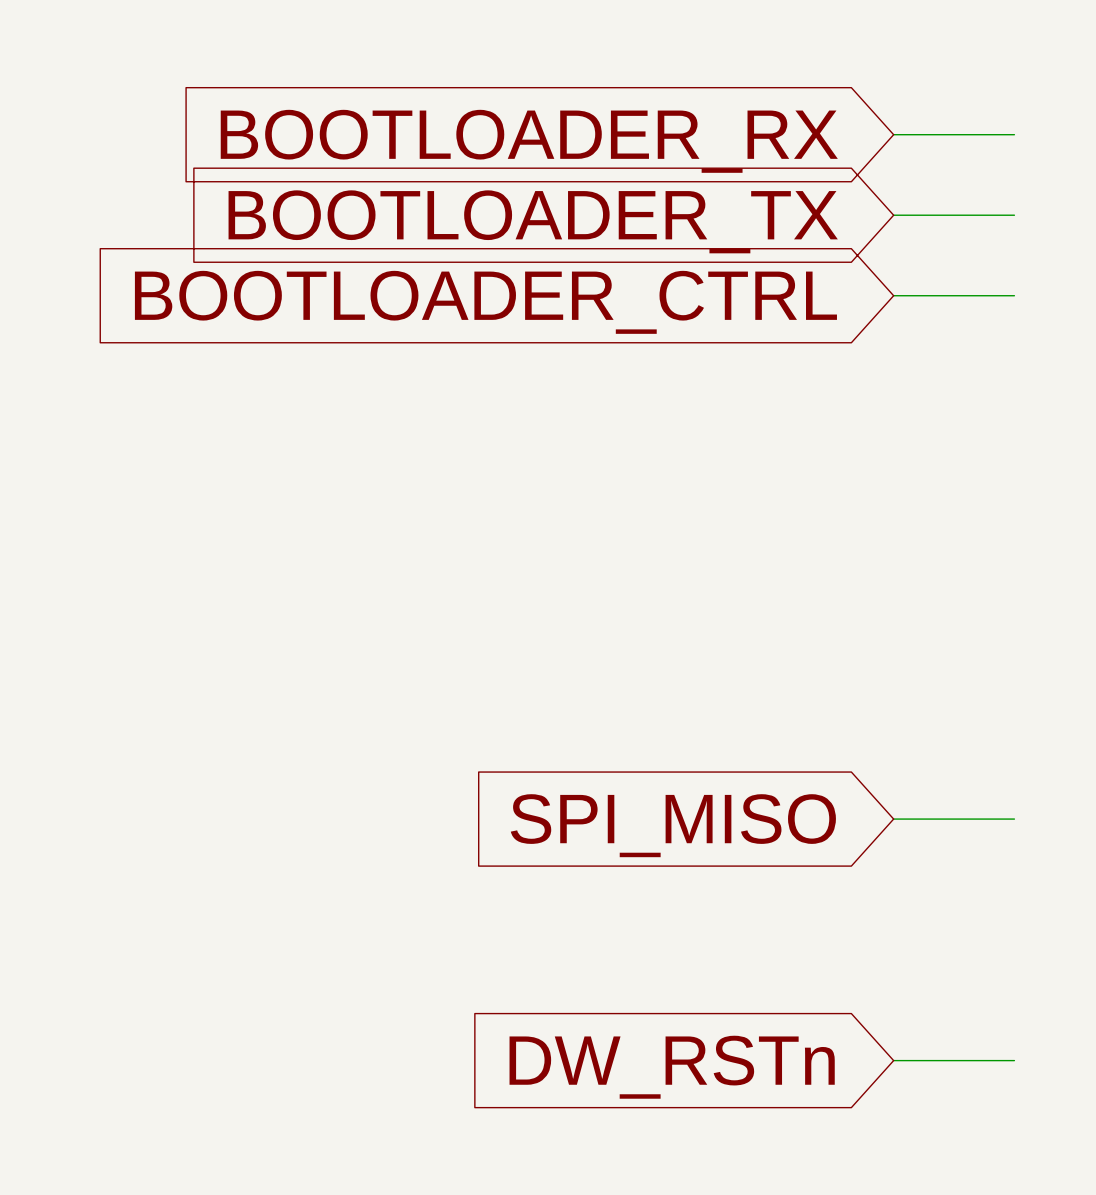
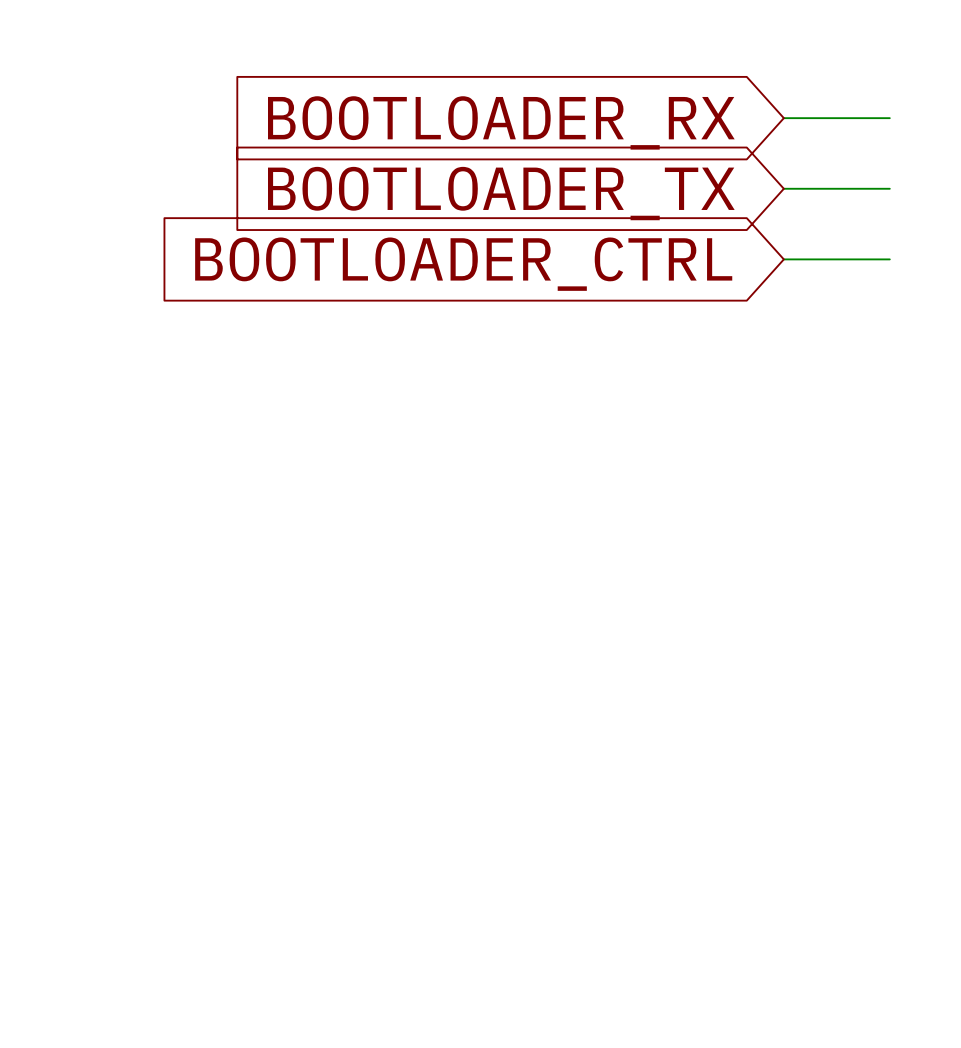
wire: (893, 819) (1014, 819) -> none
global label: SPI_MISO (673, 825) -> none
wire: (893, 1060) (1014, 1060) -> none
global label: DW_RSTn (672, 1067) -> none

